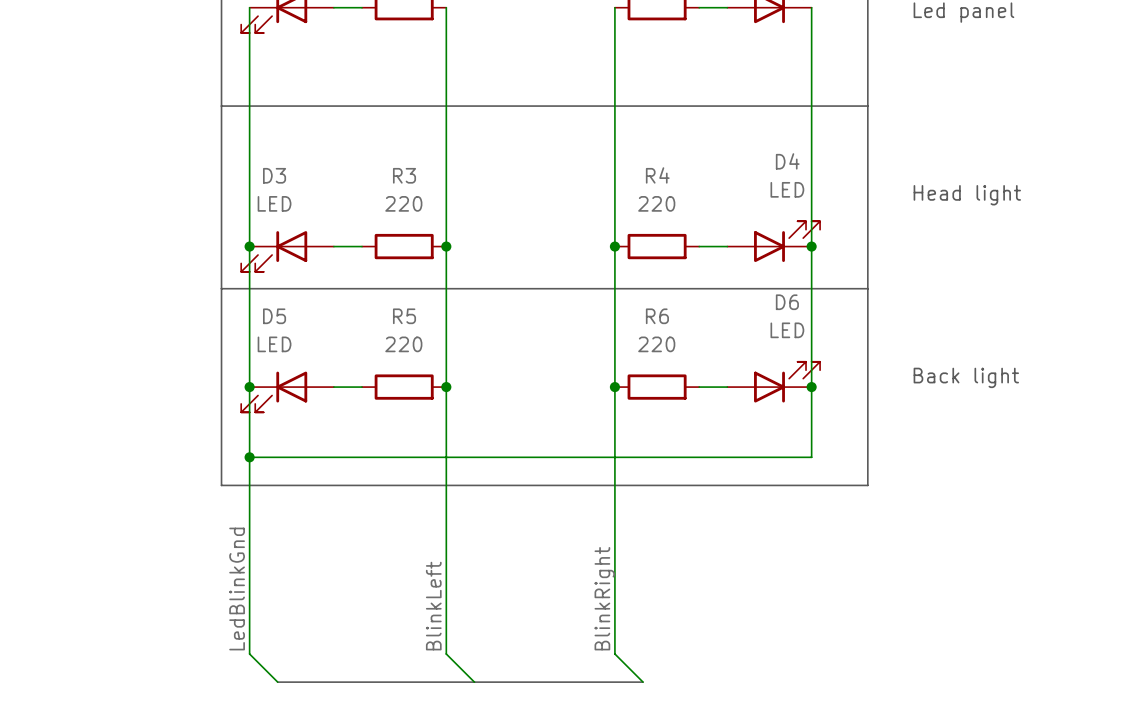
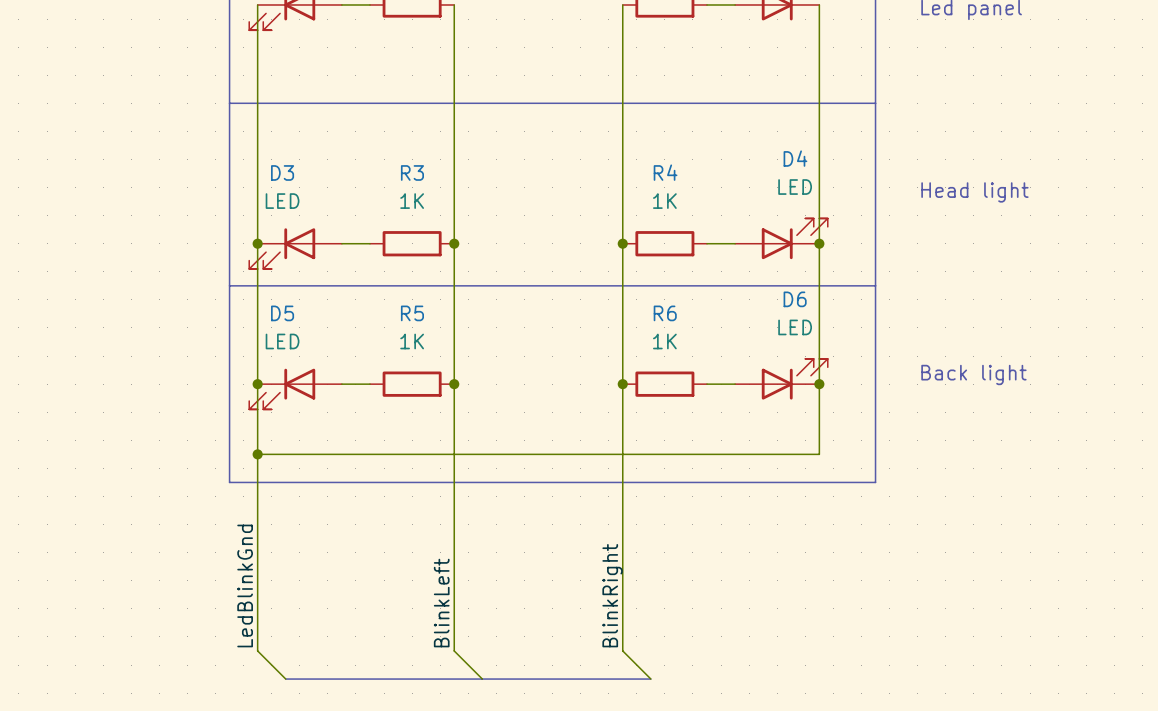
R3 value: 220 (403, 203) -> 1K (412, 201)
R4 value: 220 (656, 203) -> 1K (664, 201)
R5 value: 220 (403, 344) -> 1K (412, 341)
R6 value: 220 (656, 344) -> 1K (664, 341)

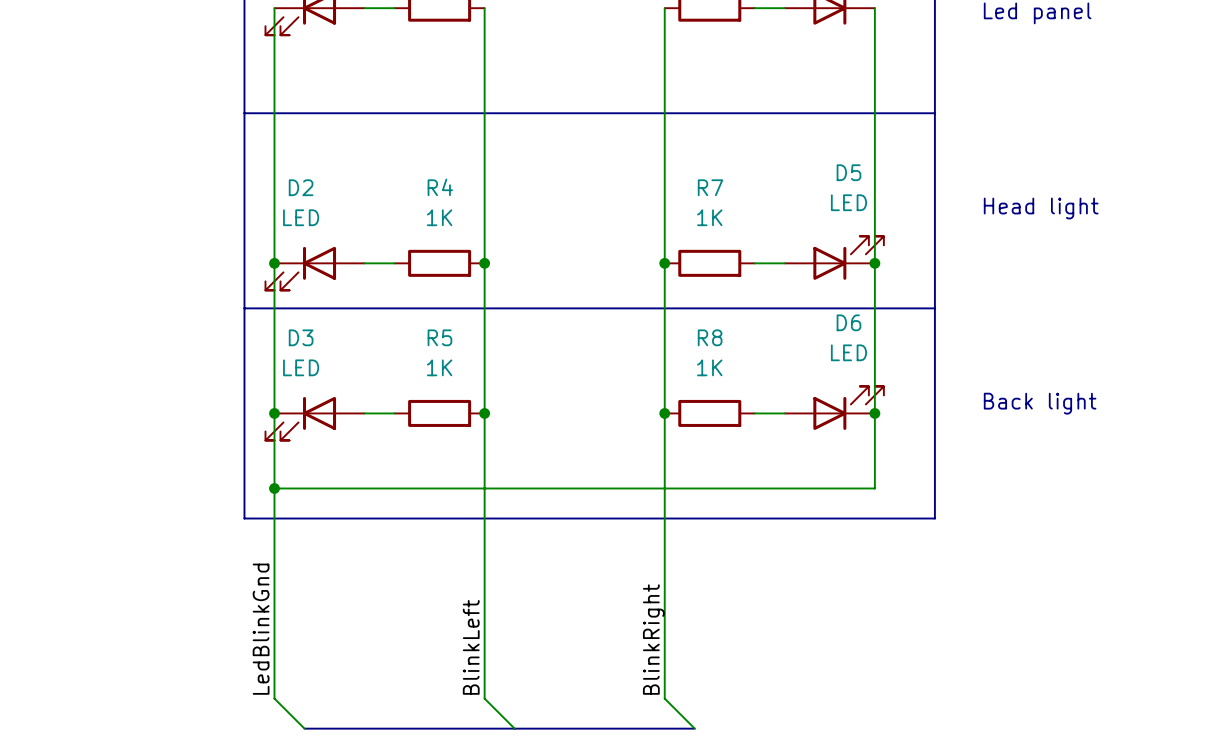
D4 name: D4 (795, 158) -> D5 (848, 172)
D3 name: D3 (282, 172) -> D2 (301, 187)
R3 name: R3 (412, 172) -> R4 (440, 187)
R4 name: R4 (665, 172) -> R7 (710, 187)
D5 name: D5 (282, 313) -> D3 (301, 337)
R6 name: R6 (665, 313) -> R8 (710, 337)

